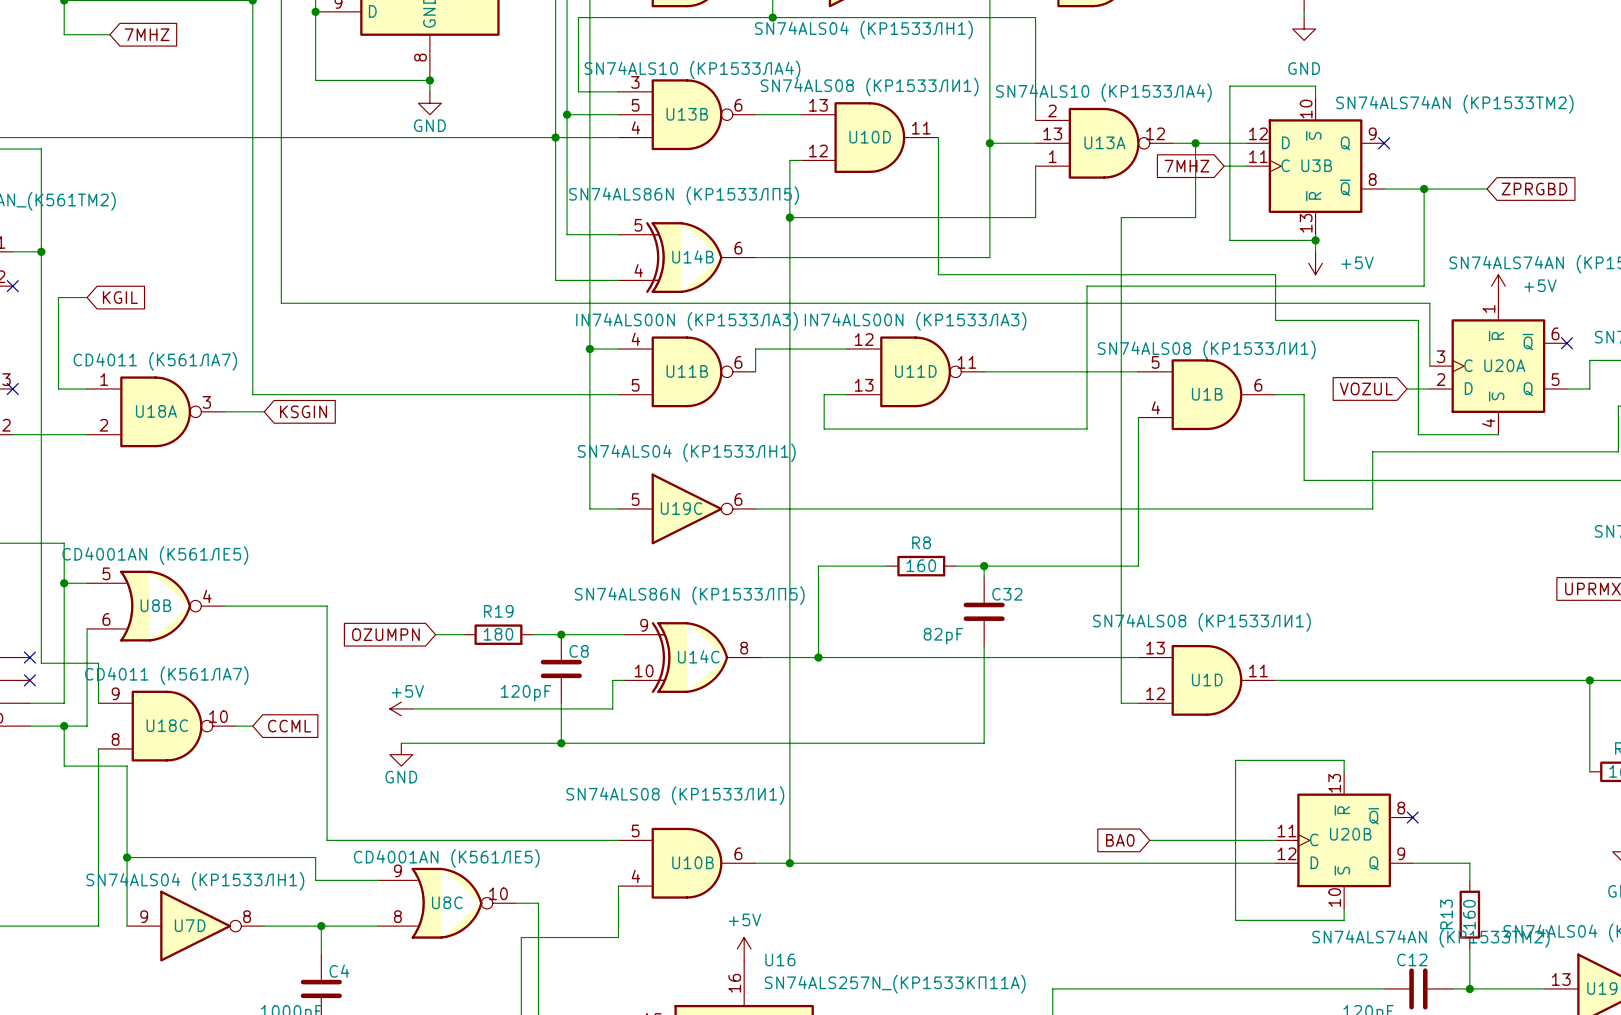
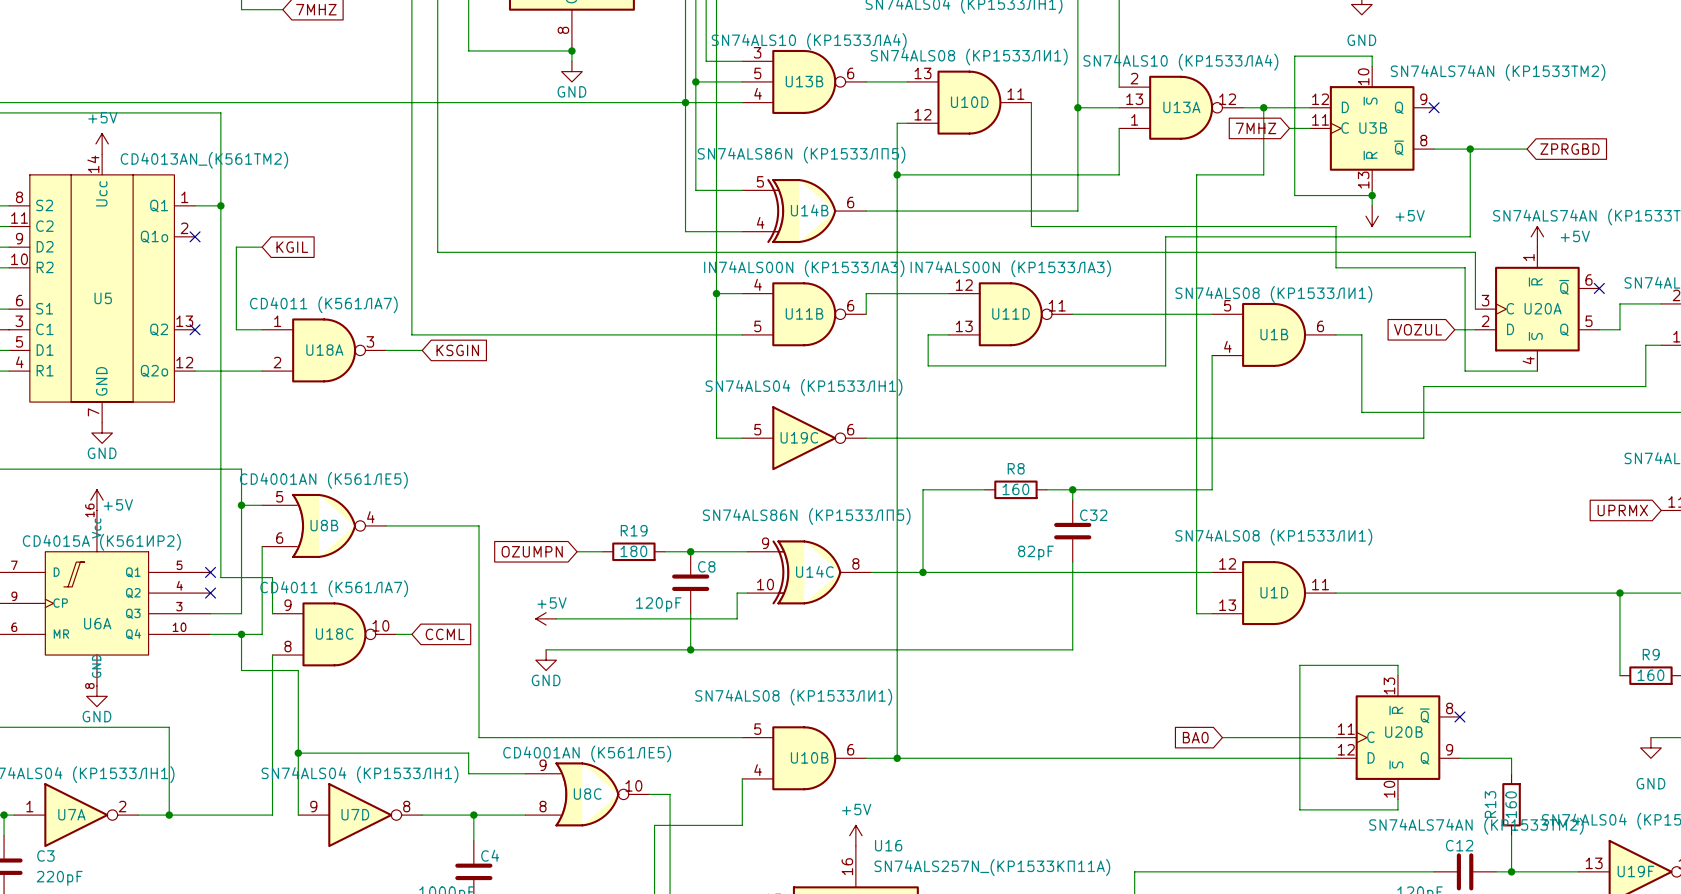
U1D flip: as is (1207, 680) -> up-down (1274, 593)

